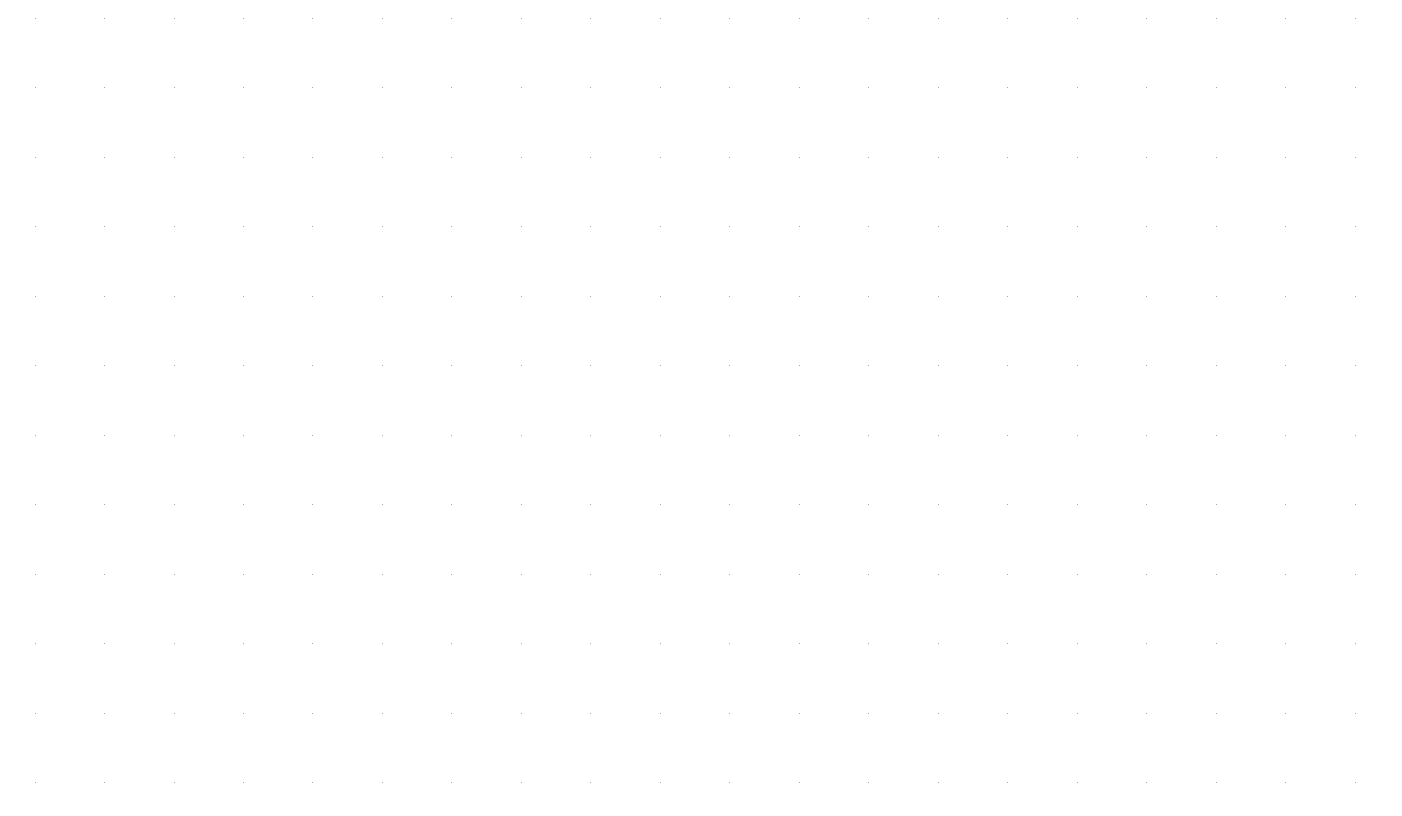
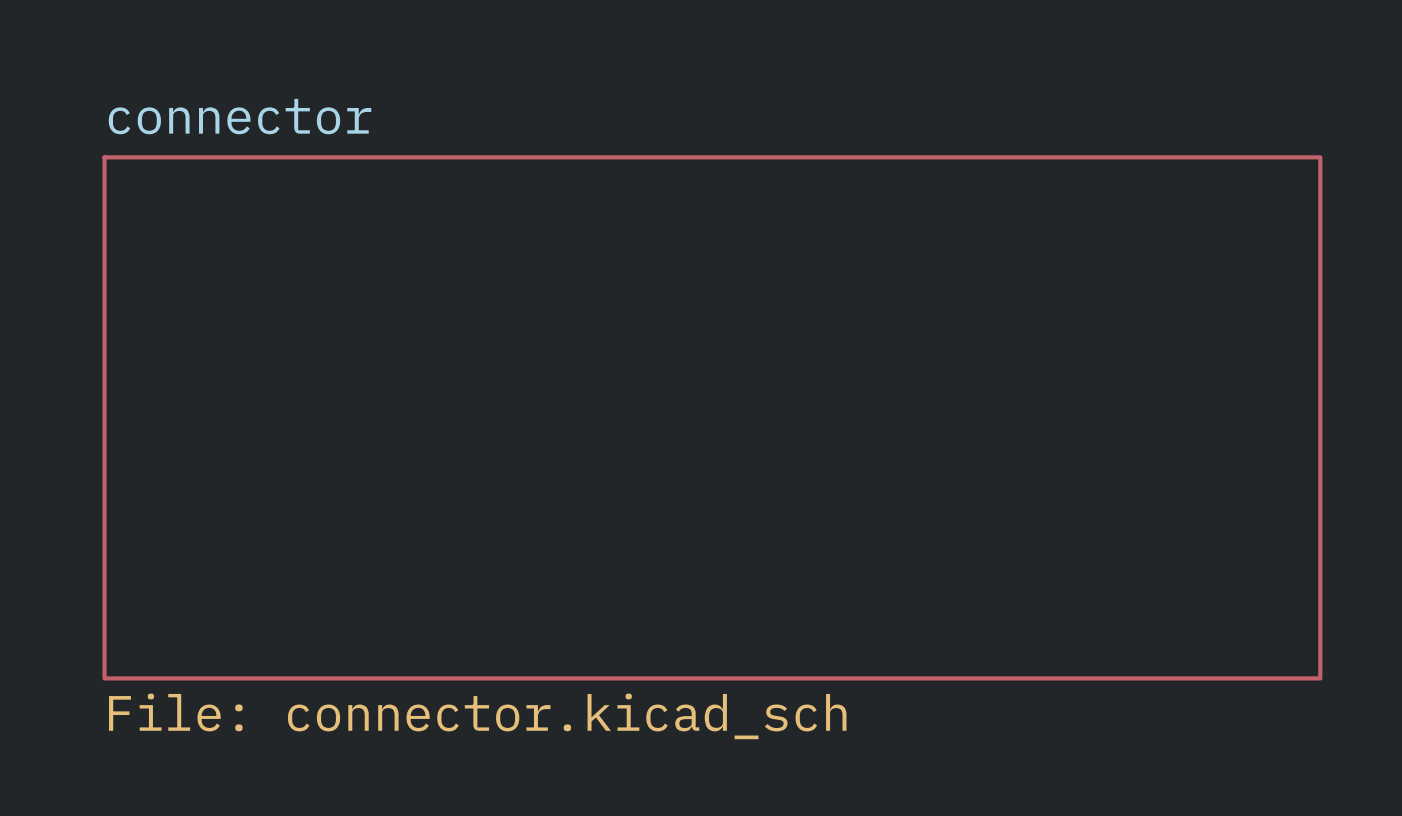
sheet connector: none -> File: connector.kicad_sch (712, 417)

